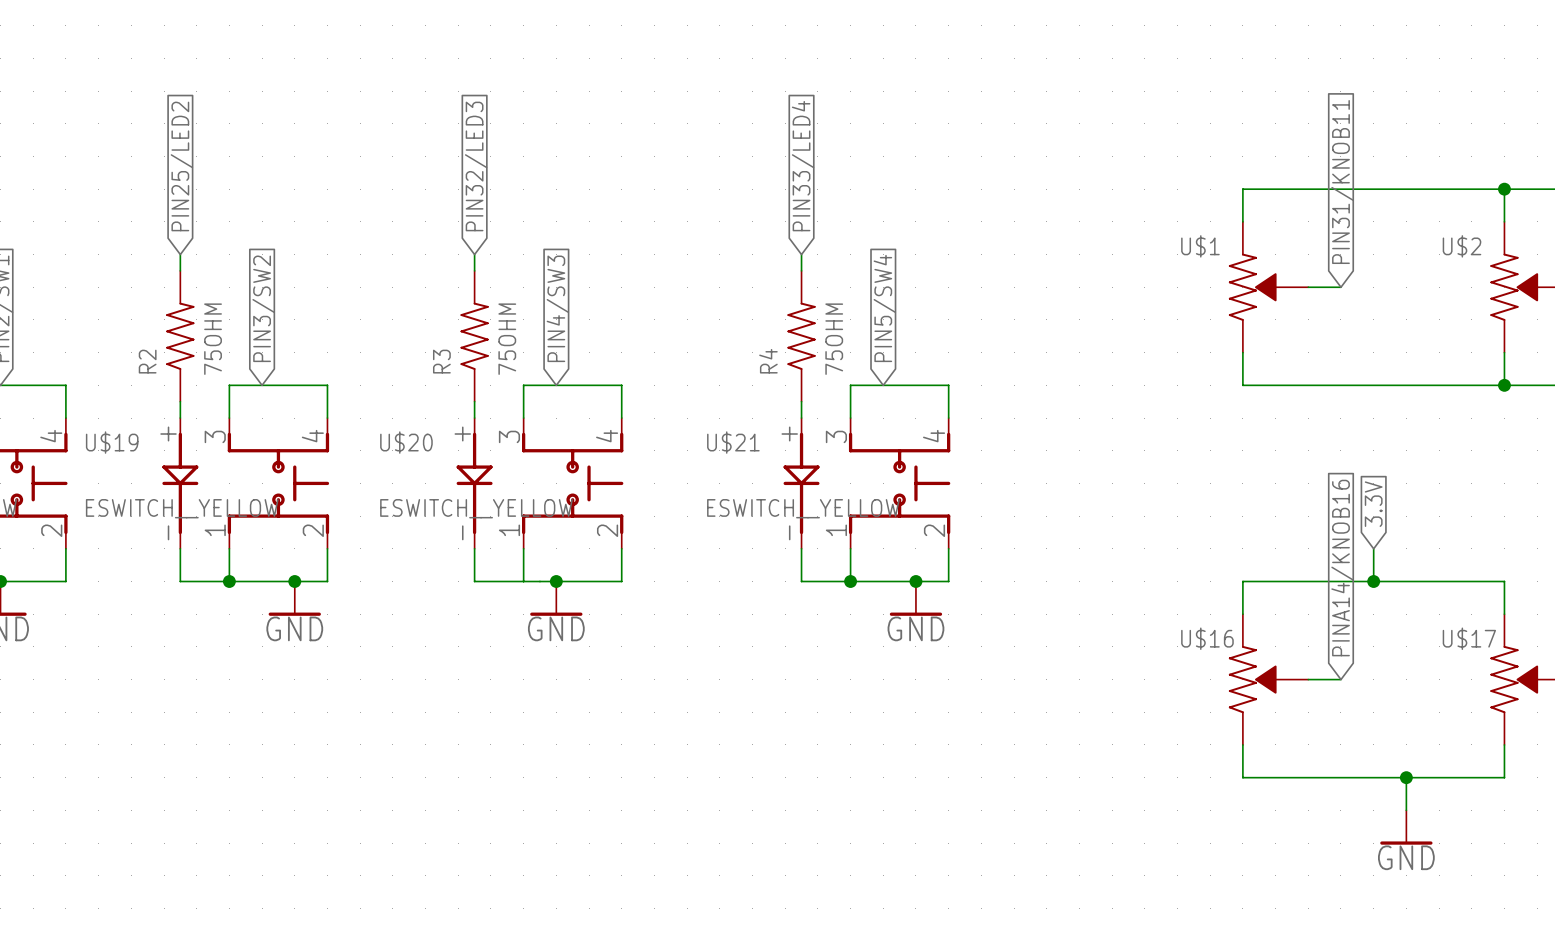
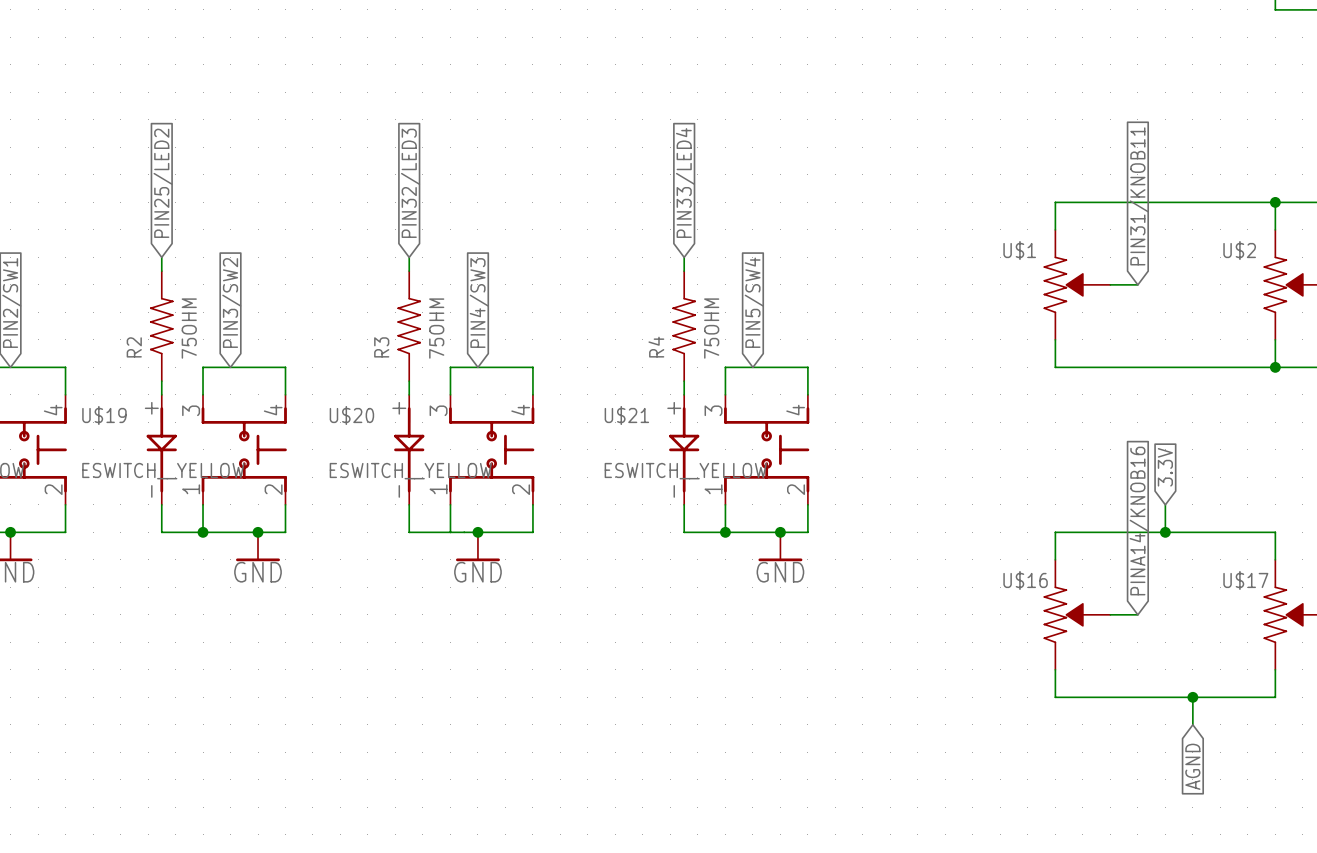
power symbol: GND (1406, 827) -> none
global label: none -> AGND (1192, 766)

